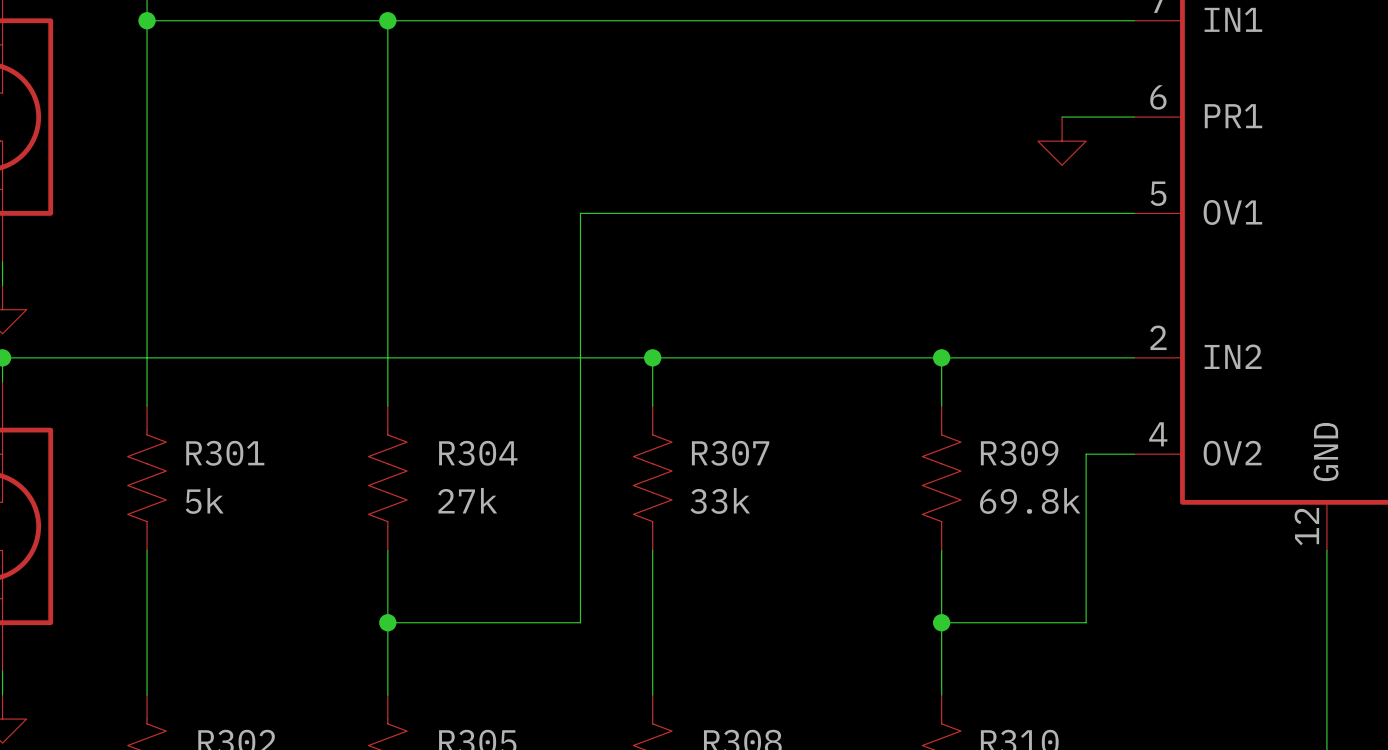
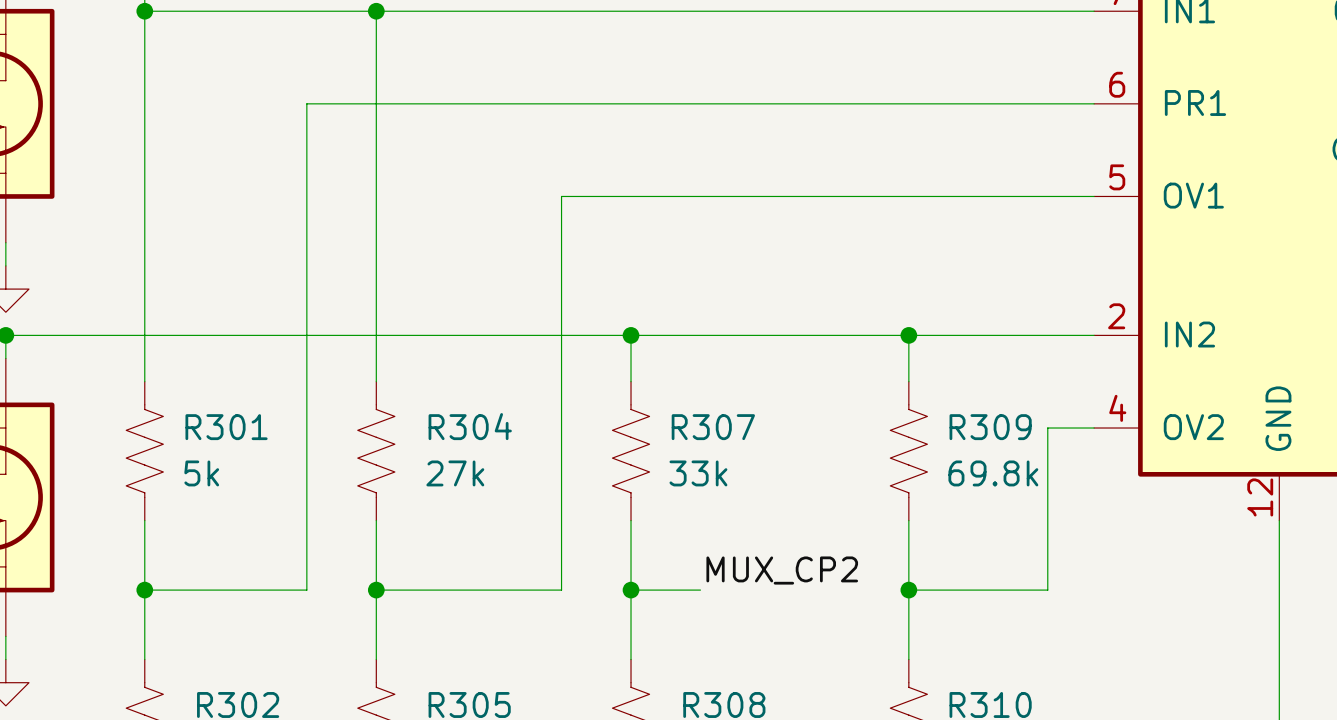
wire: none -> (1024, 103) (306, 103) (306, 590) (144, 590)
power symbol: (1062, 141) -> none
label: none -> MUX_CP2 (782, 570)
junction: none -> (144, 590)
wire: none -> (631, 590) (700, 590)
junction: none -> (631, 590)

